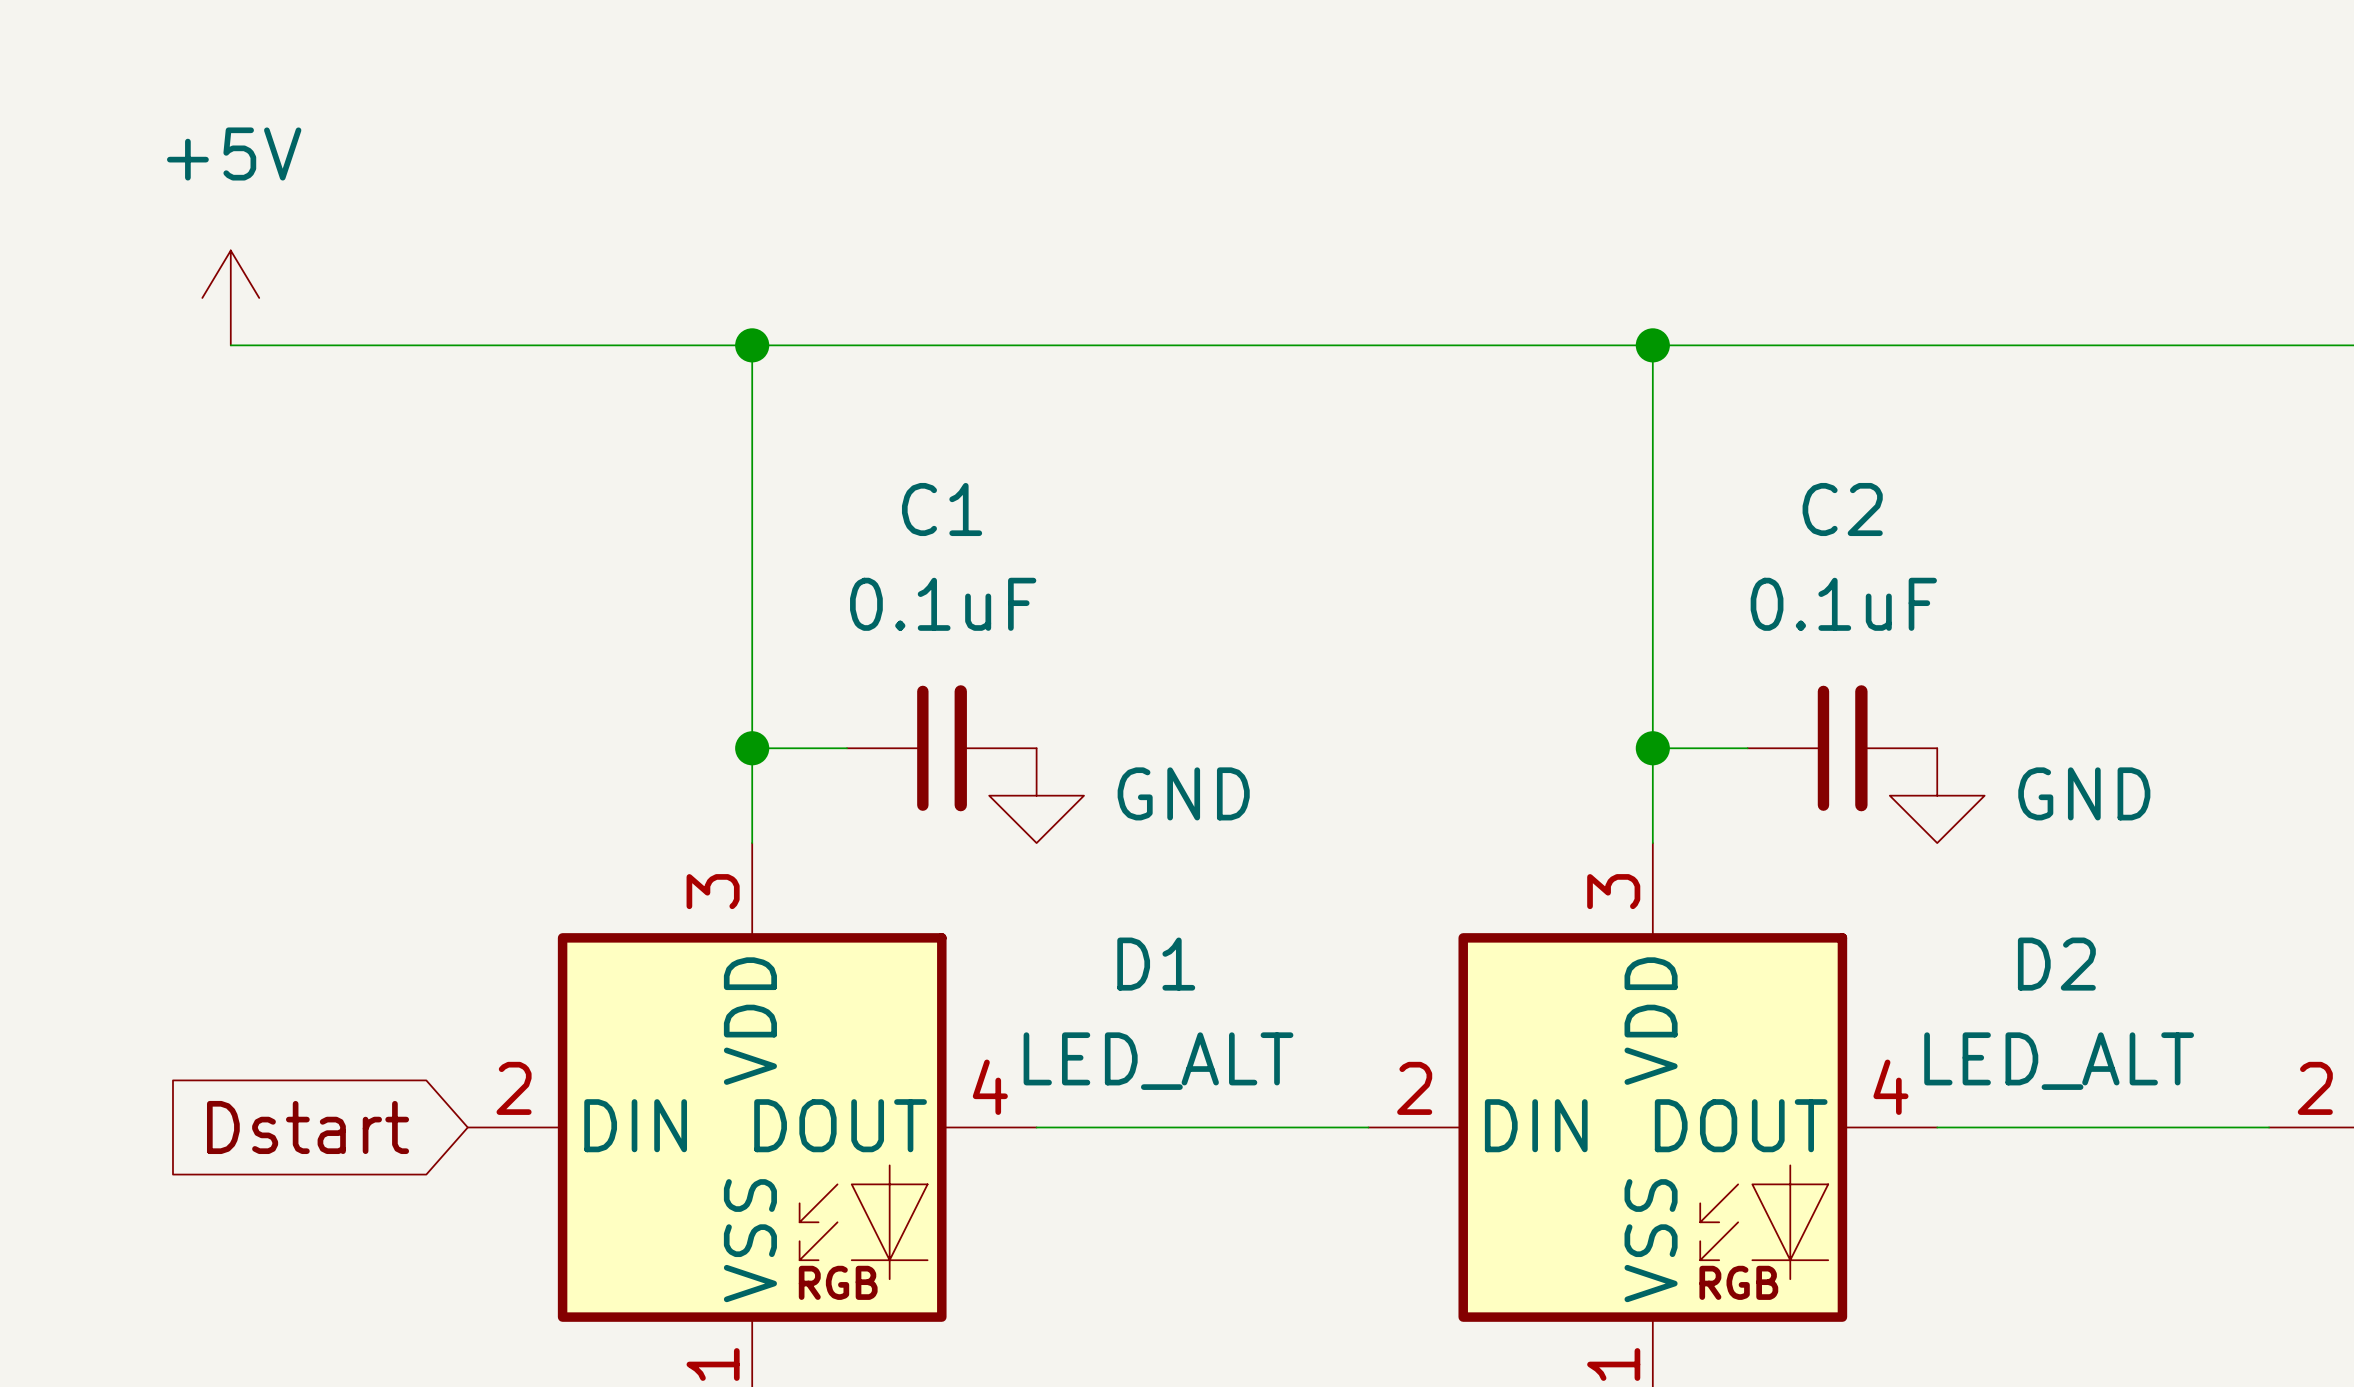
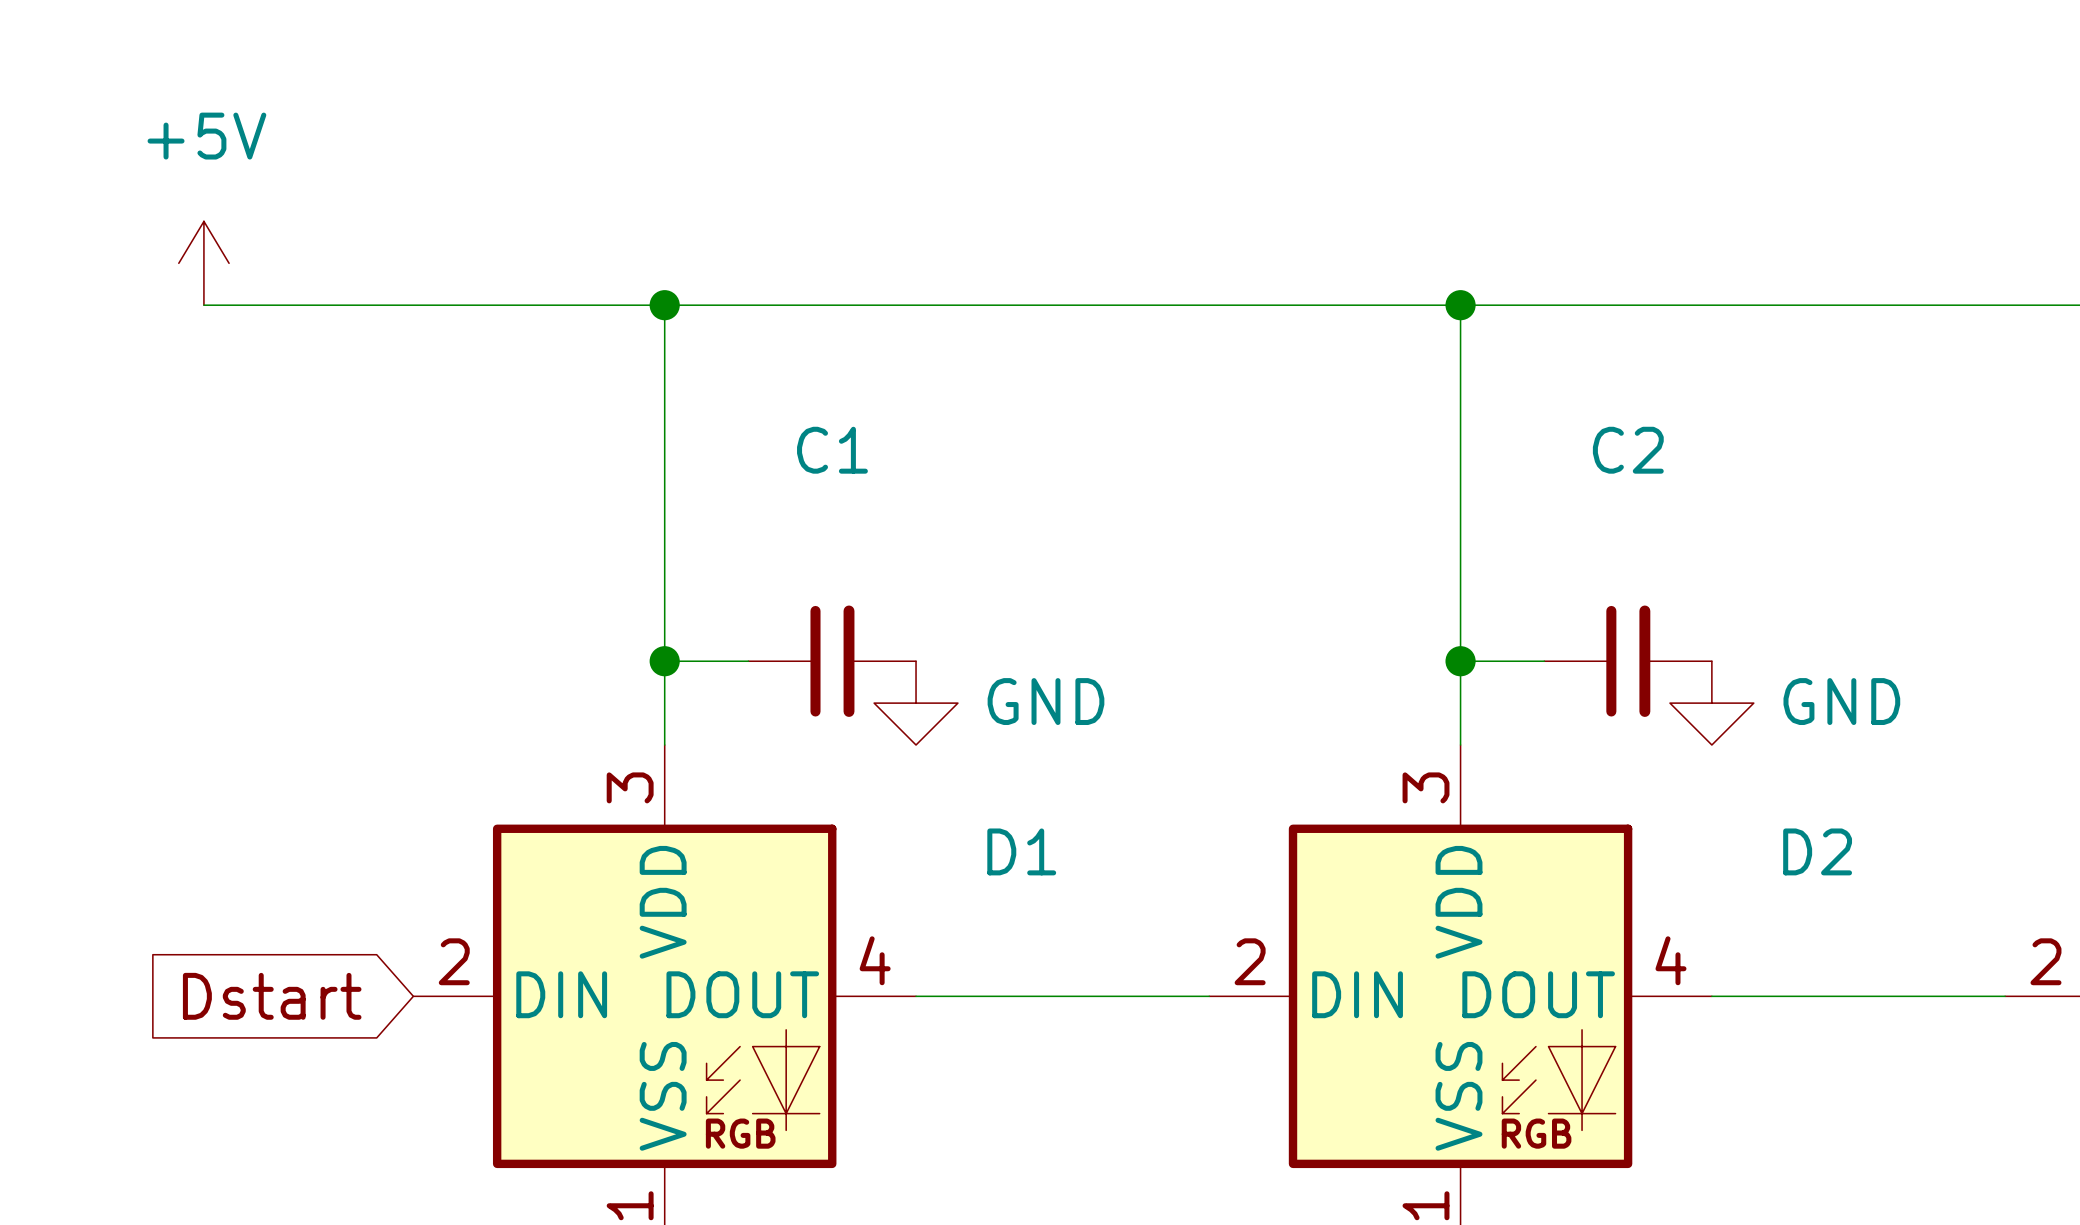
C1 value: 0.1uF (943, 604) -> none
C2 value: 0.1uF (1843, 604) -> none
D1 value: LED_ALT (1158, 1061) -> none
D2 value: LED_ALT (2059, 1061) -> none

